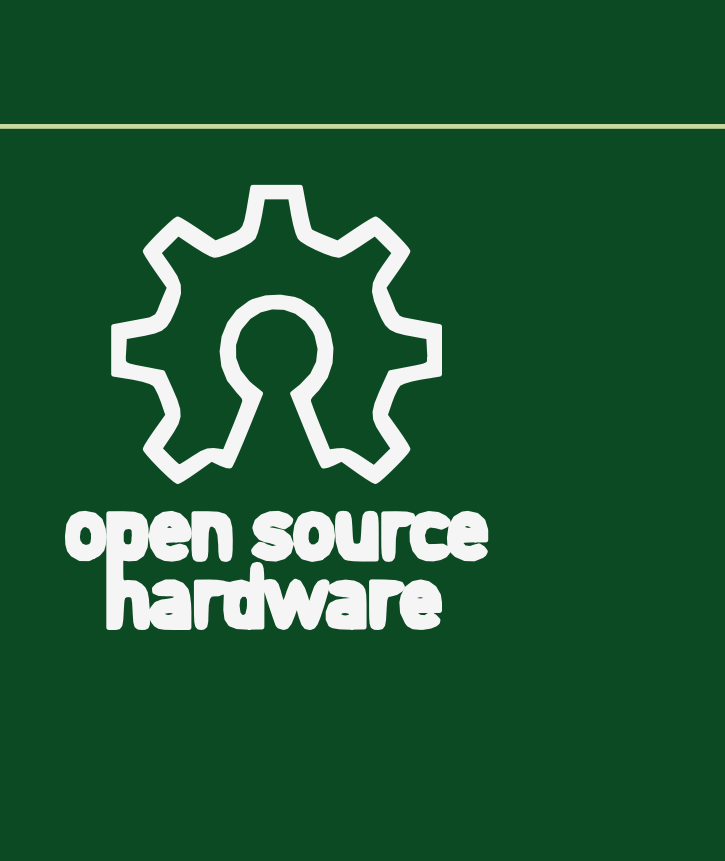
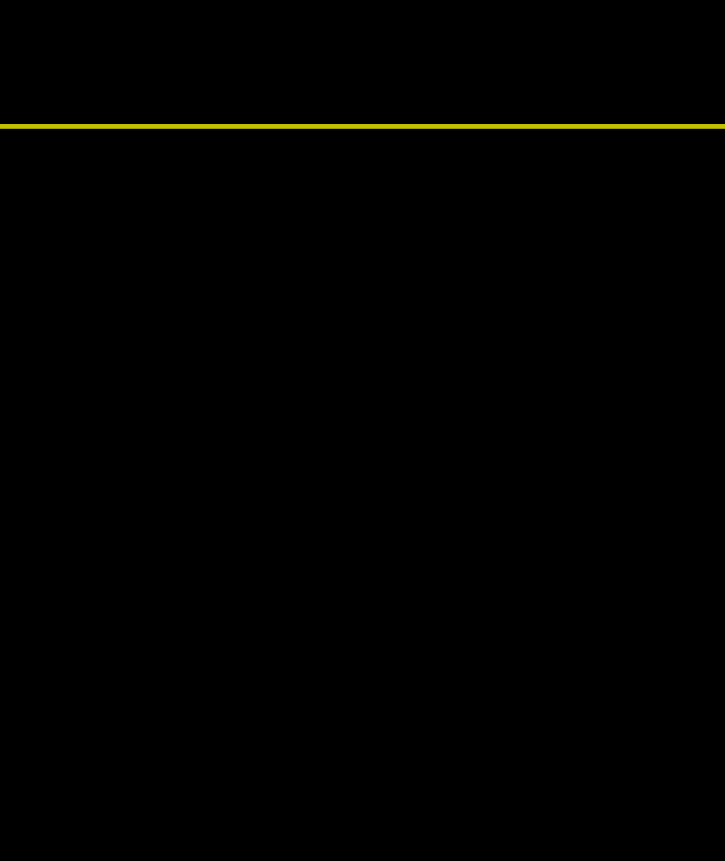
drawing: [64, 184, 489, 630] -> none

